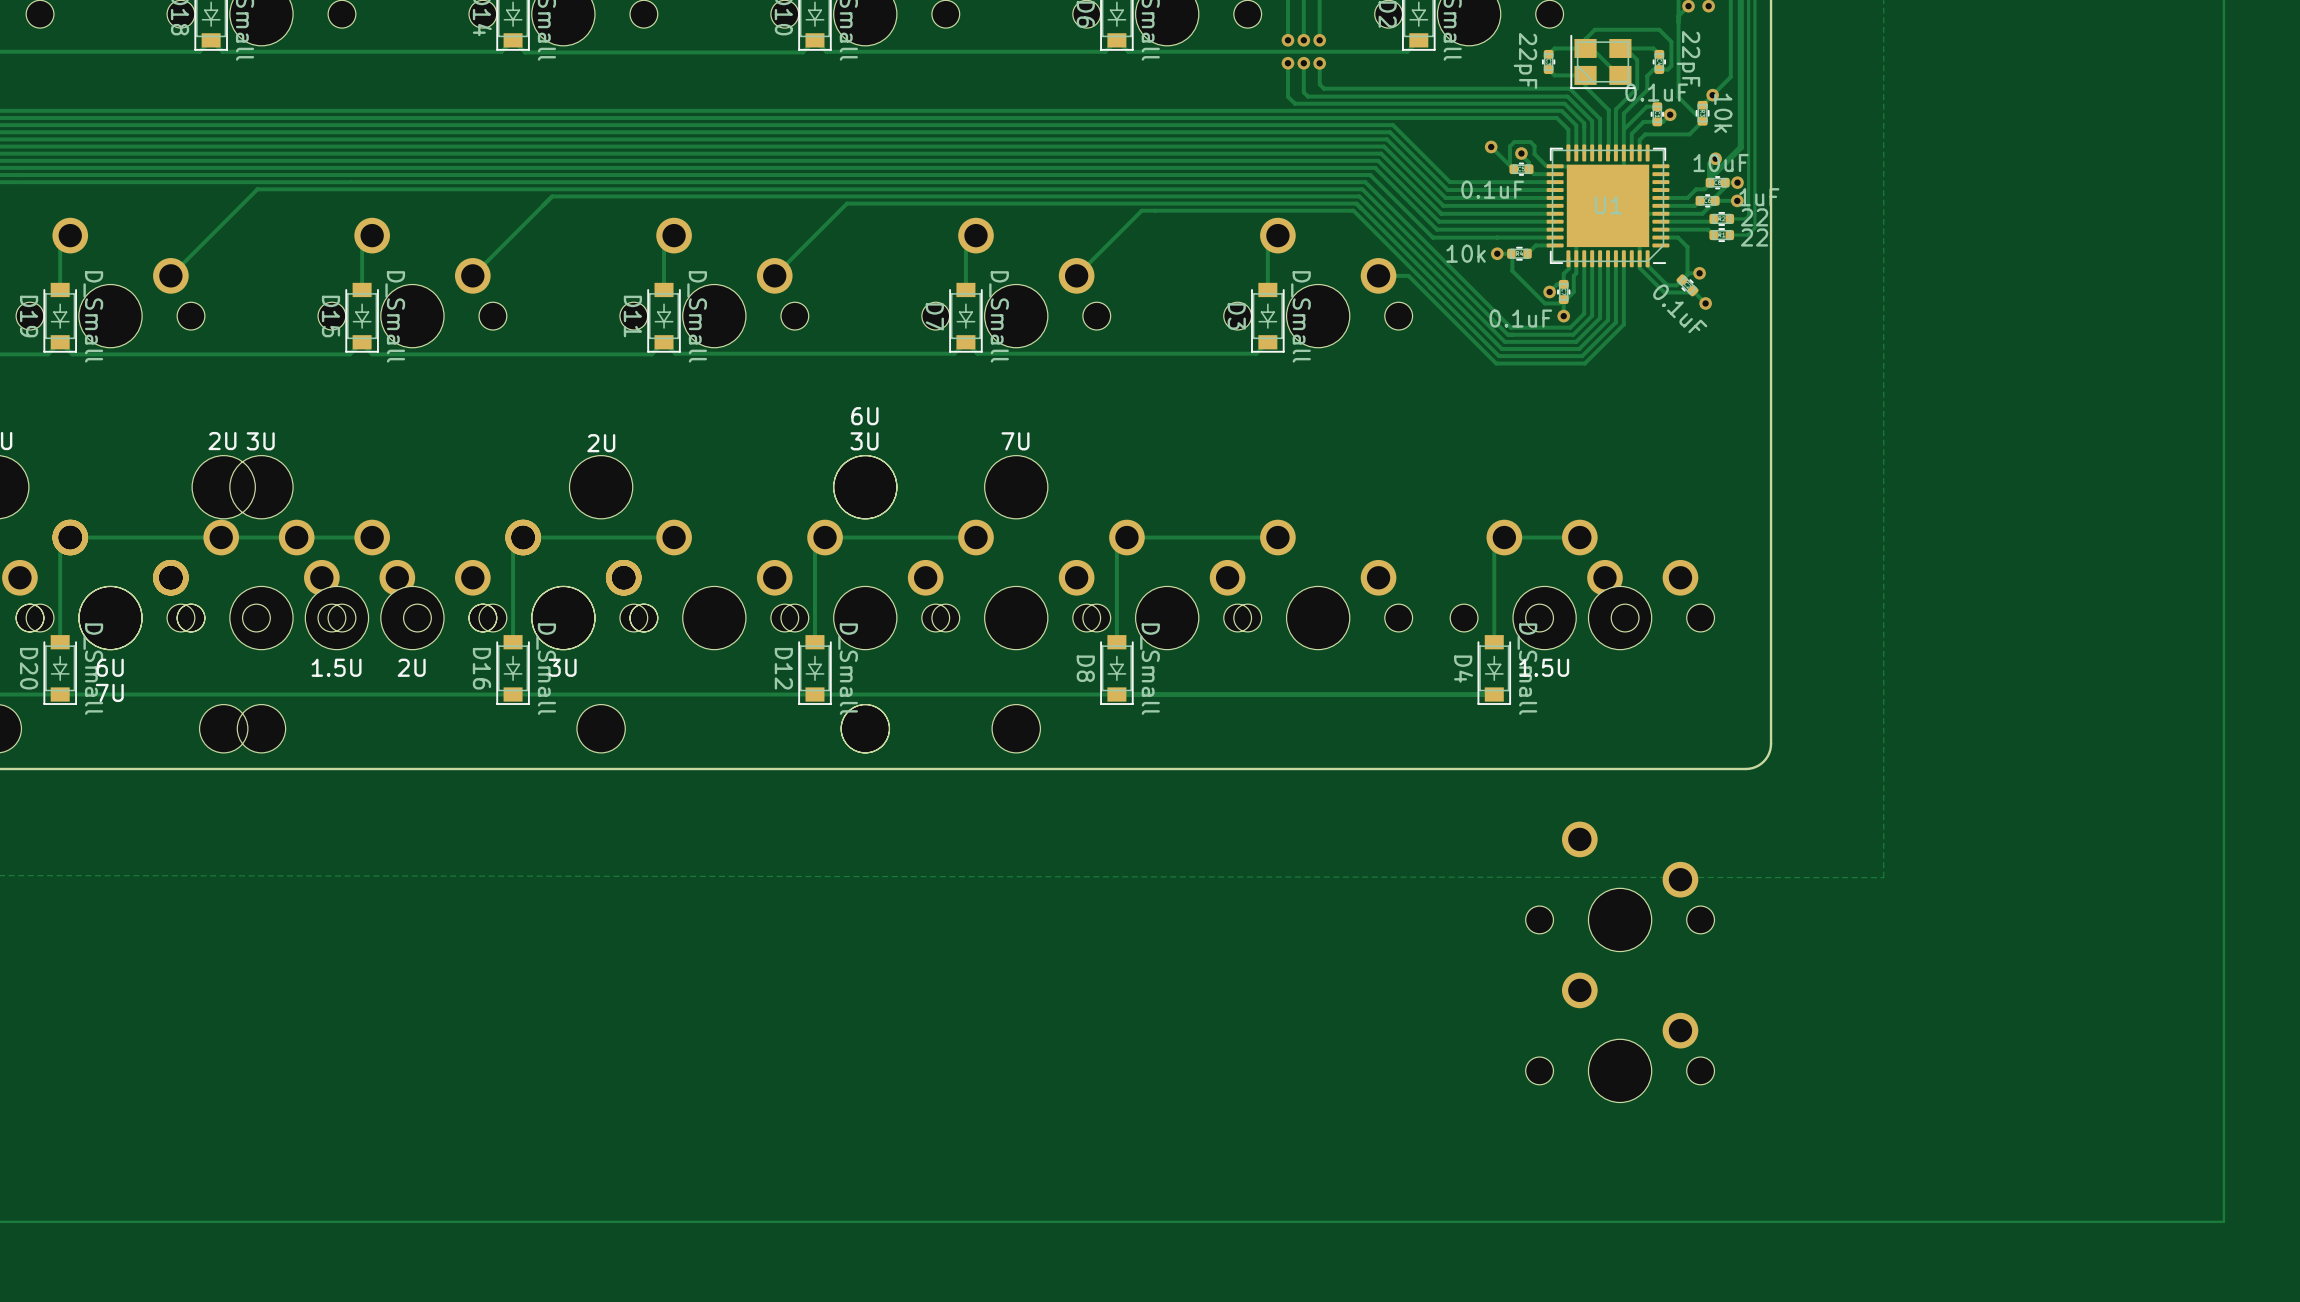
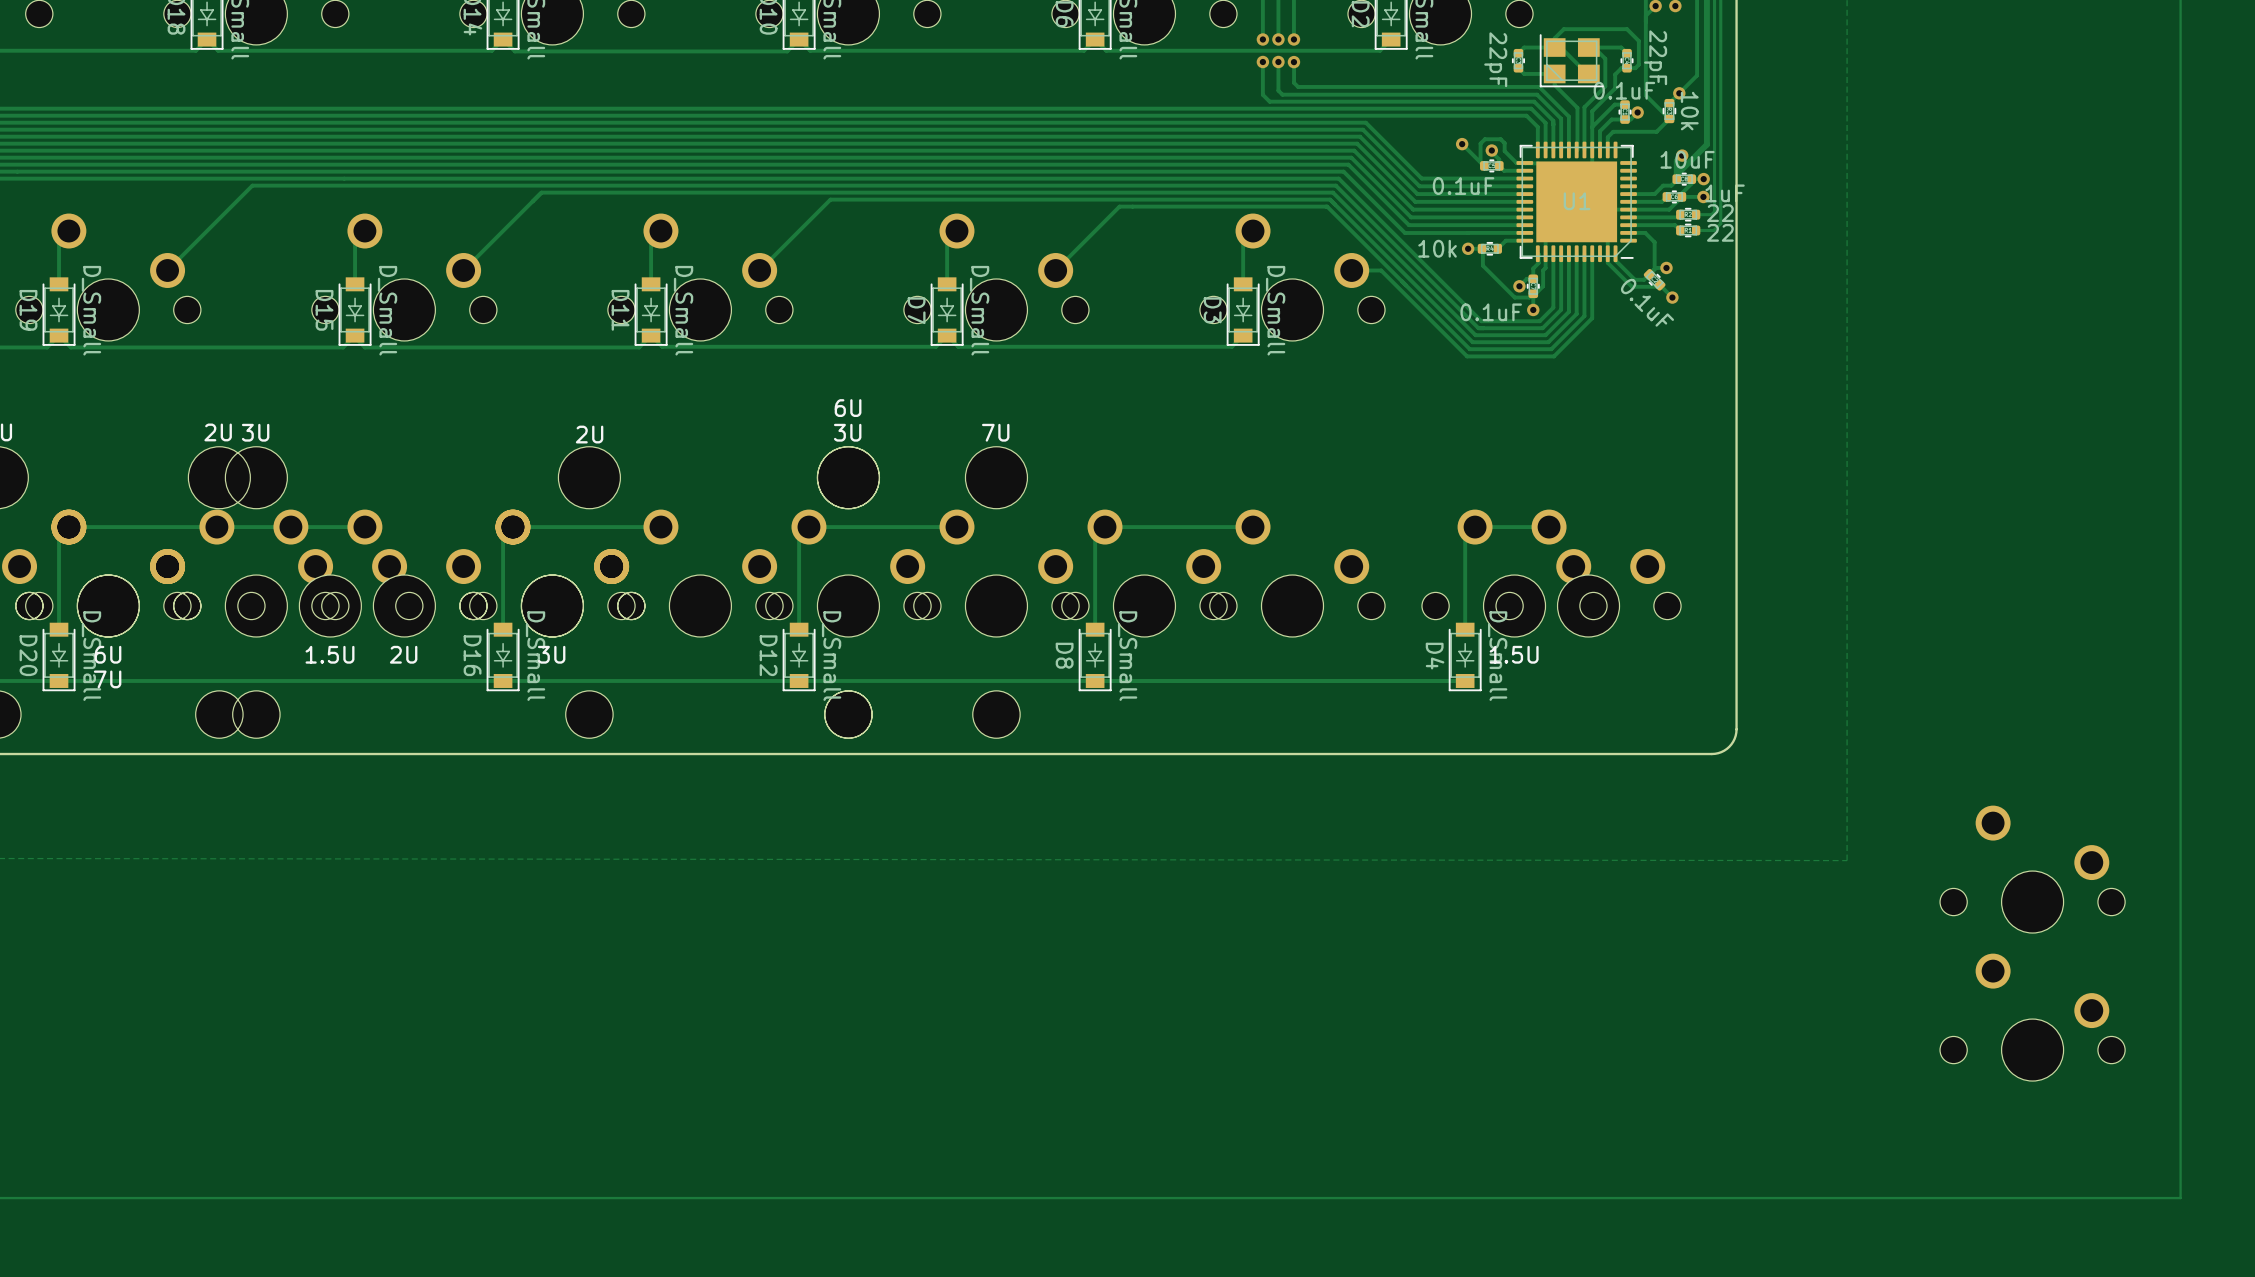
part: (1620, 886) -> none
part: none -> (2032, 869)
part: (1620, 1037) -> none
part: none -> (2032, 1017)

